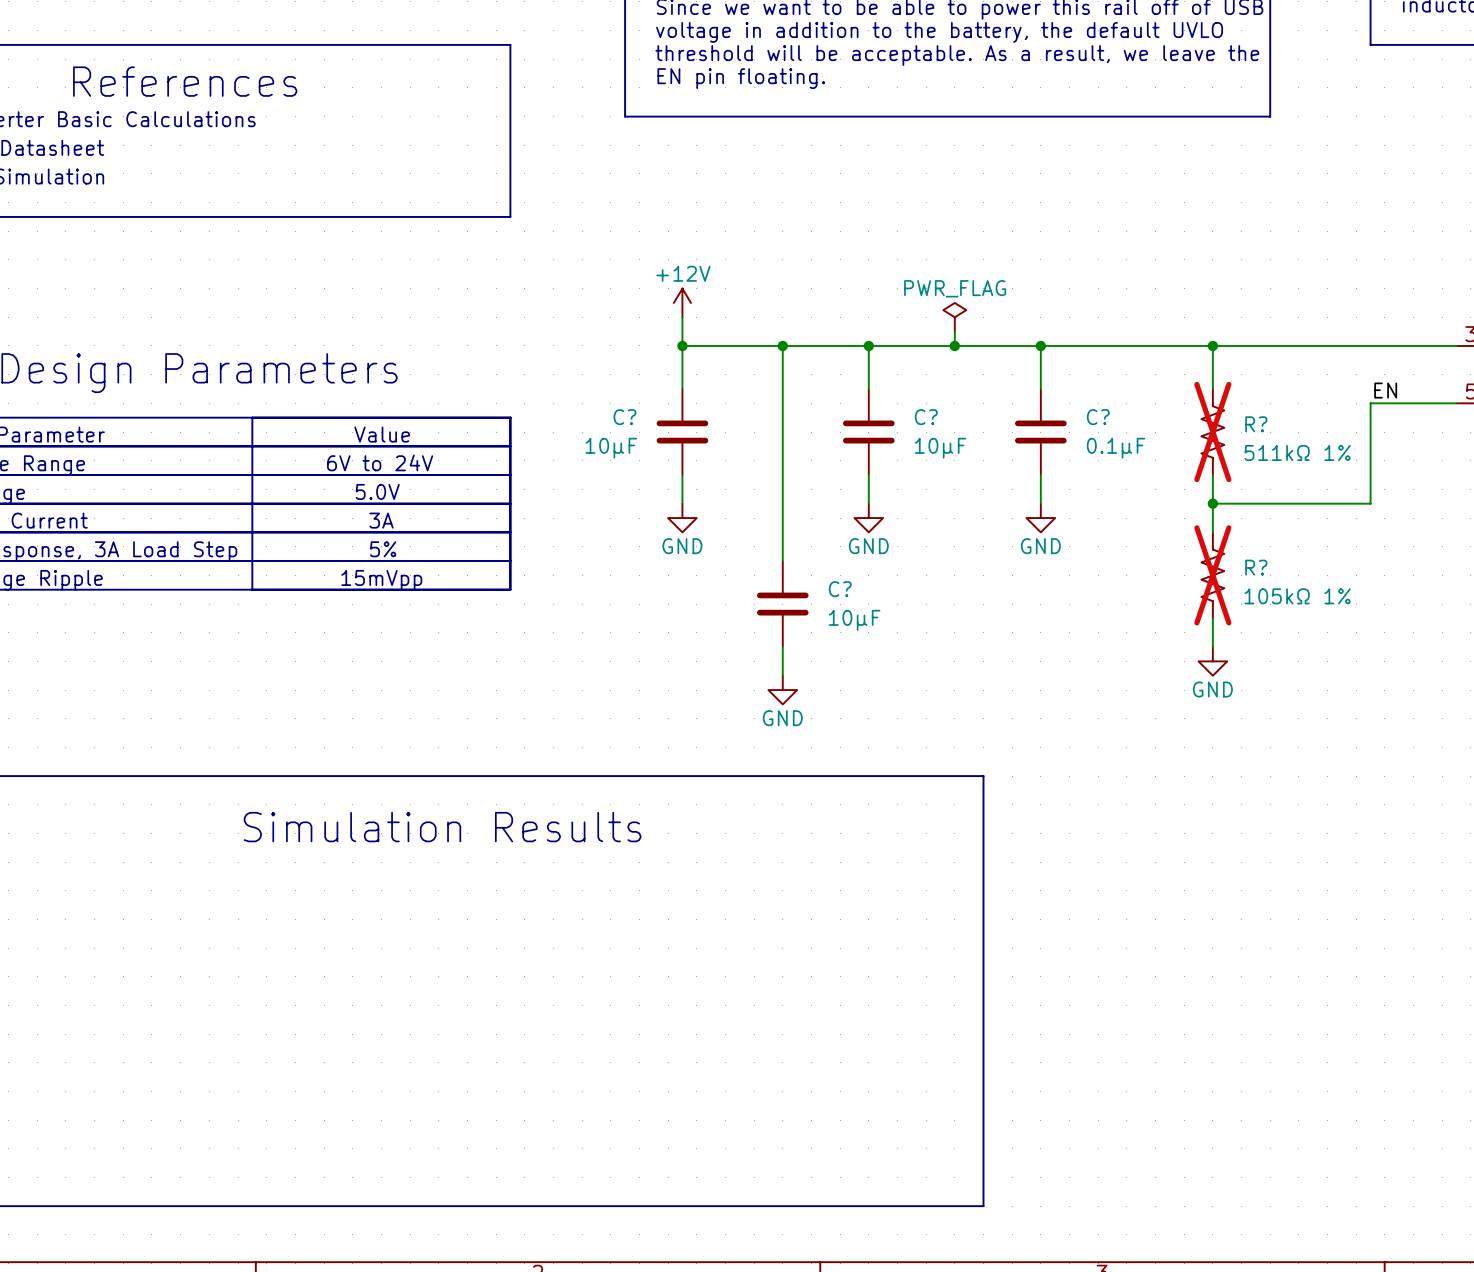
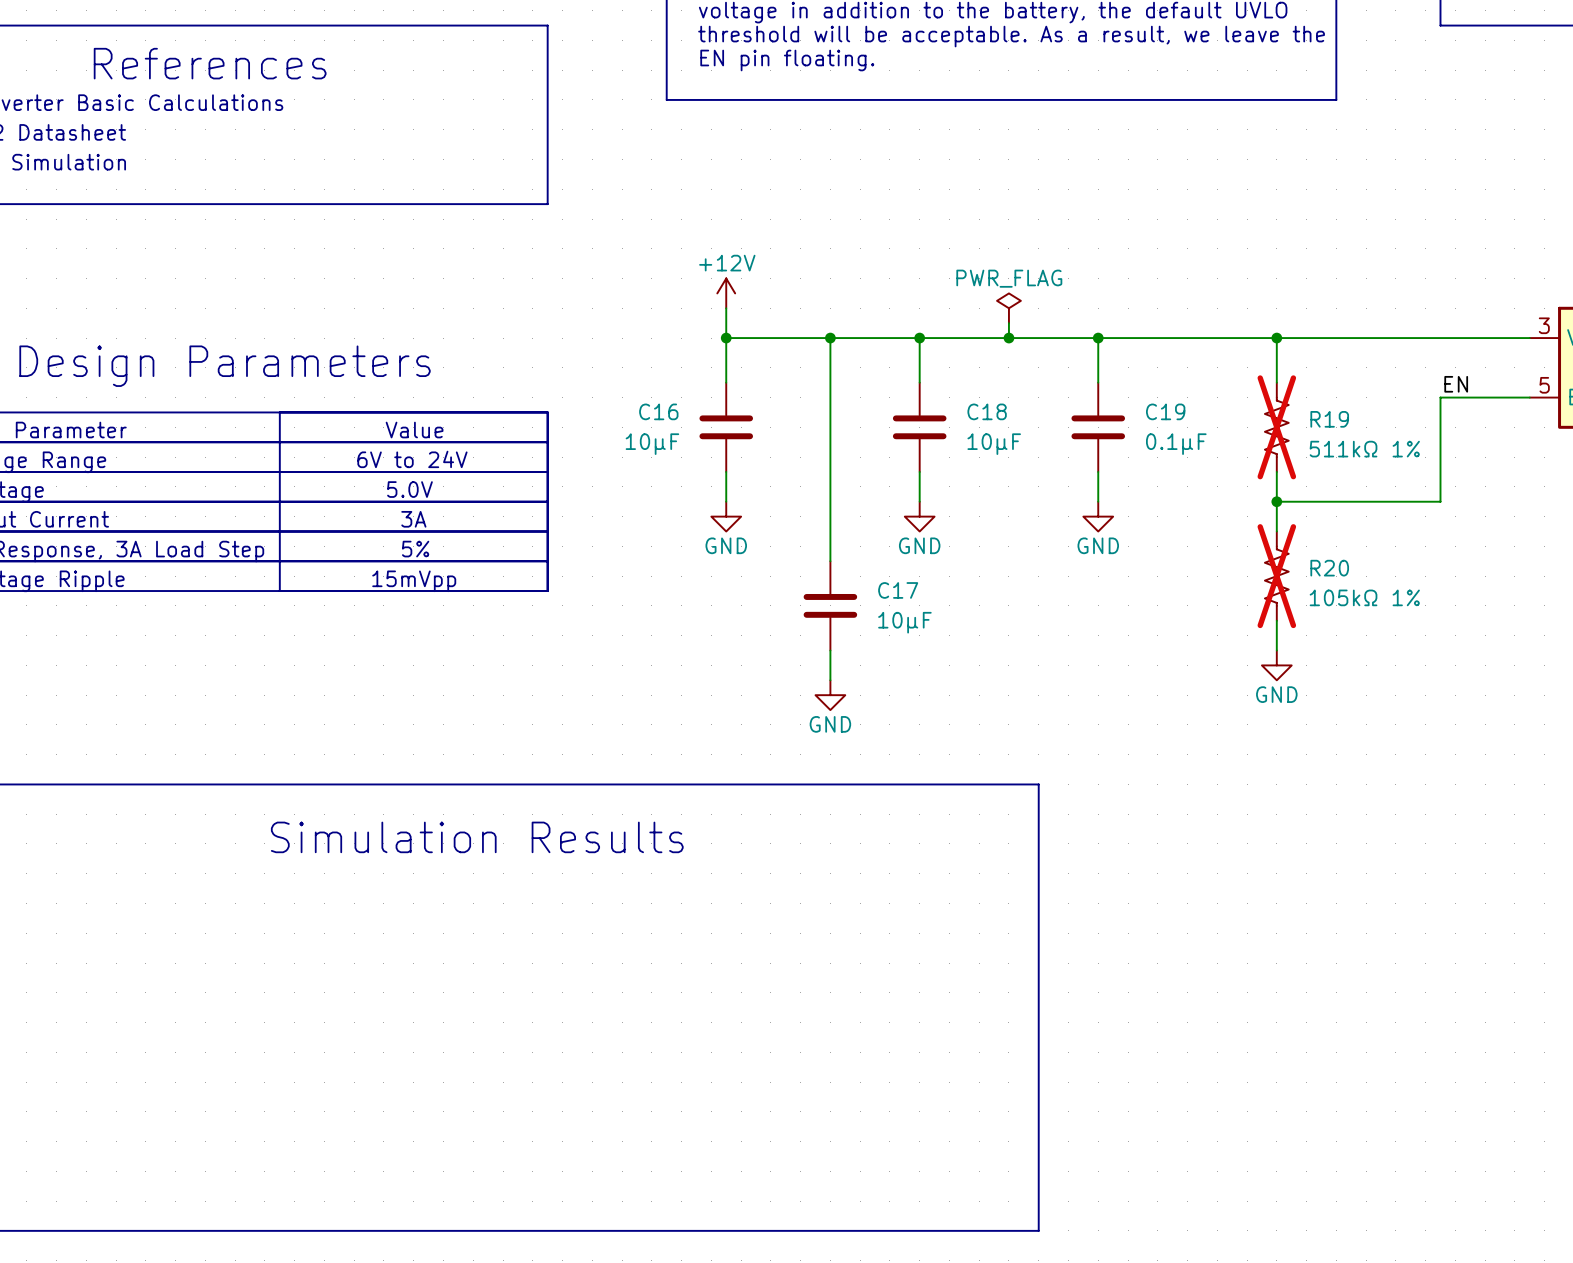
C? name: C? (624, 417) -> C16 (658, 411)
C? name: C? (926, 417) -> C18 (987, 411)
C? name: C? (1098, 417) -> C19 (1165, 411)
R? name: R? (1256, 424) -> R19 (1329, 419)
R? name: R? (1256, 567) -> R20 (1329, 568)
C? name: C? (840, 589) -> C17 (898, 590)

